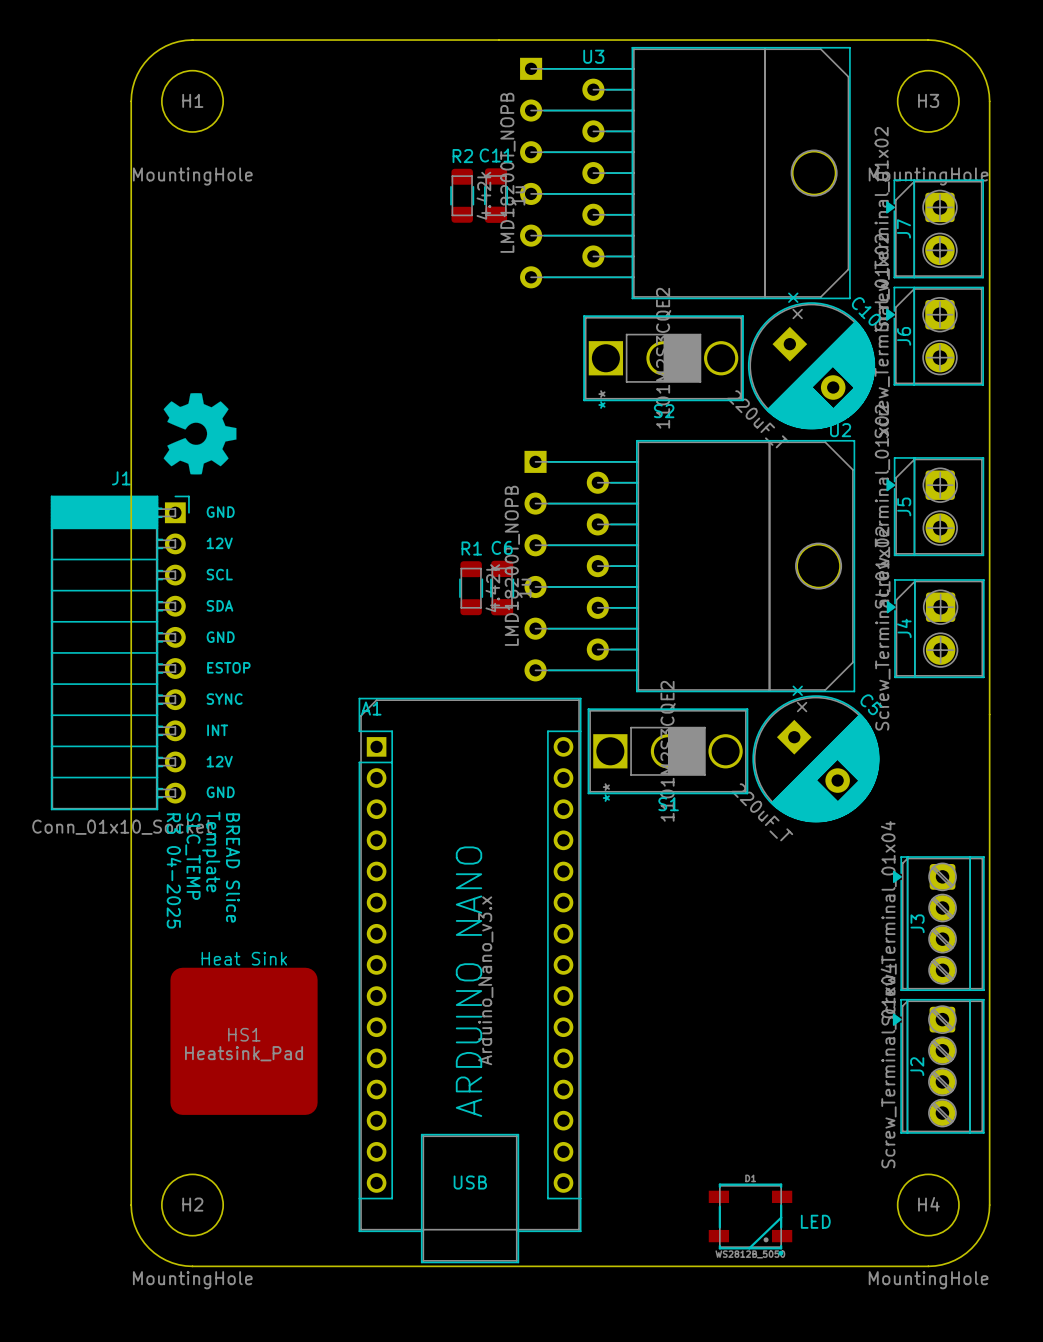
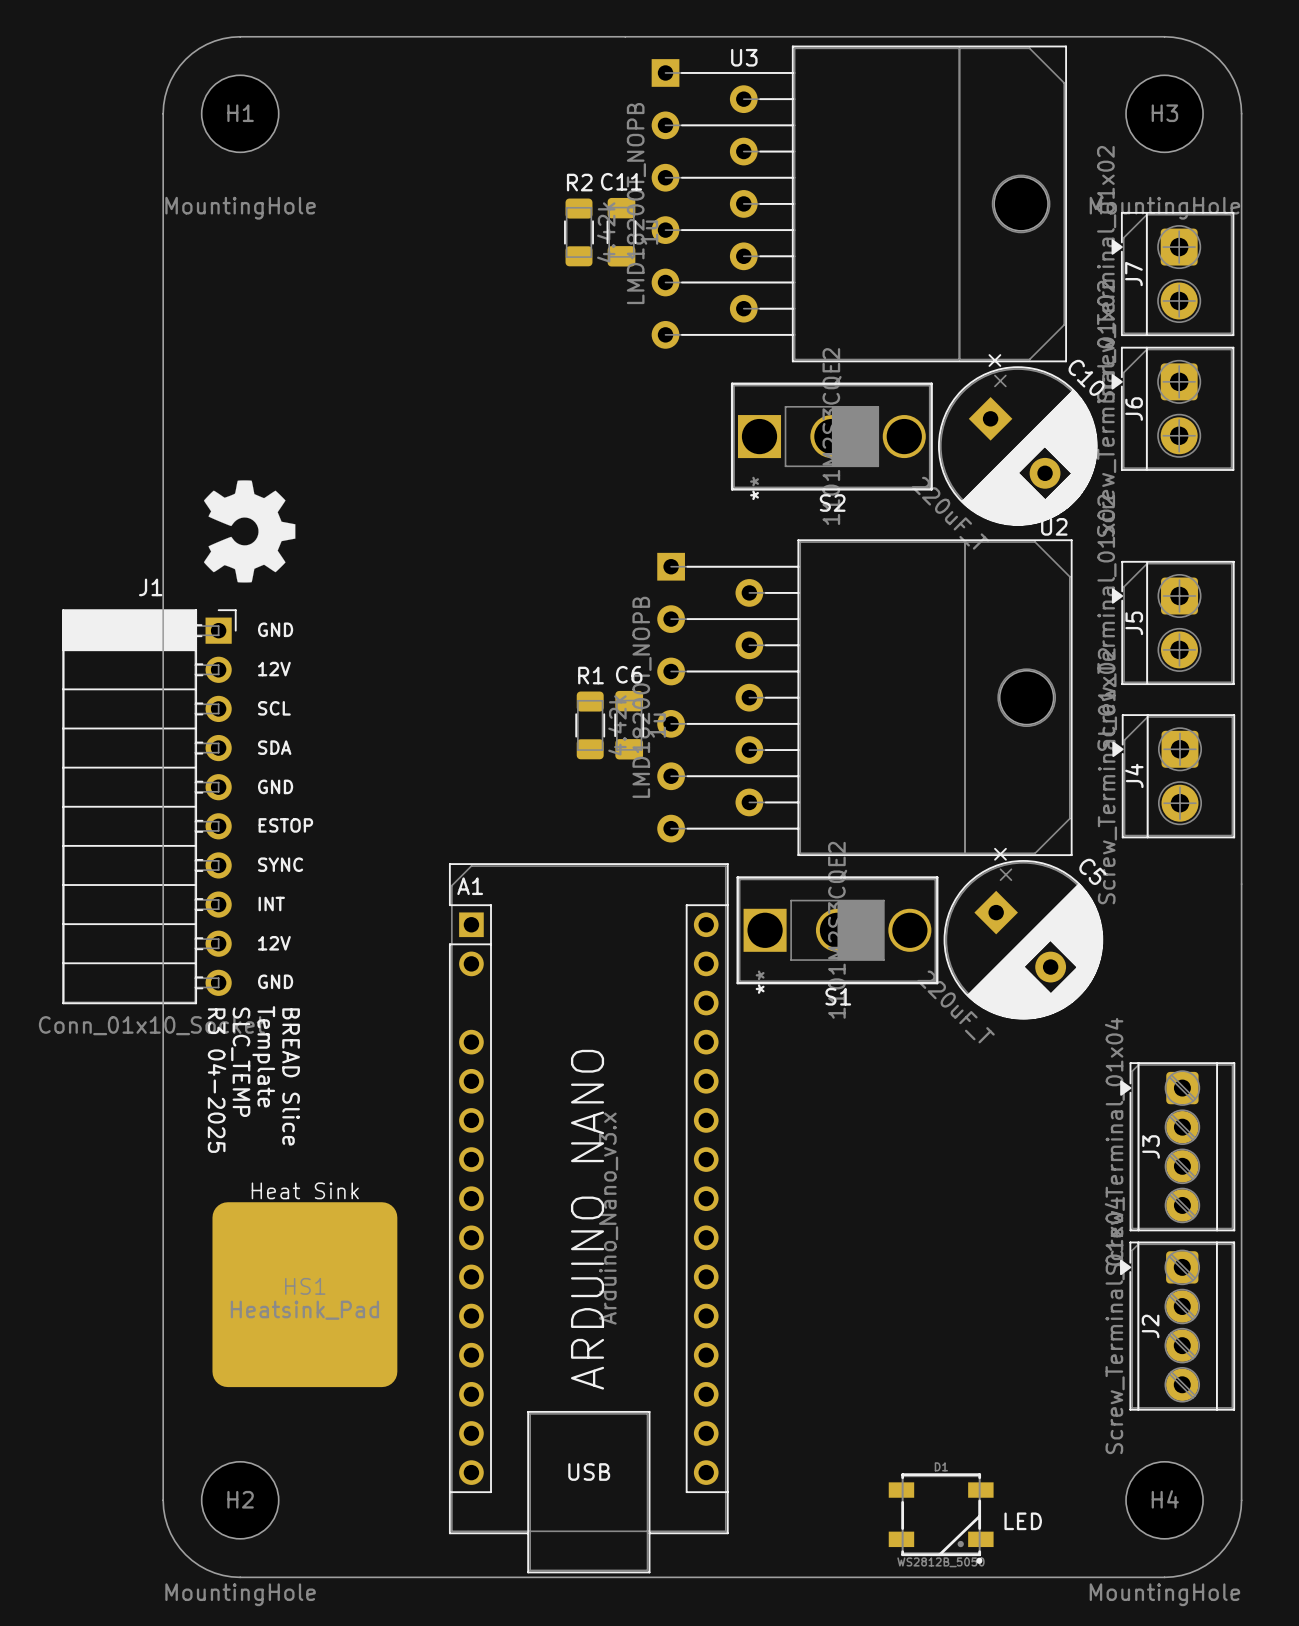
A1 footprint: [358, 697, 582, 1264] -> [448, 863, 729, 1574]

